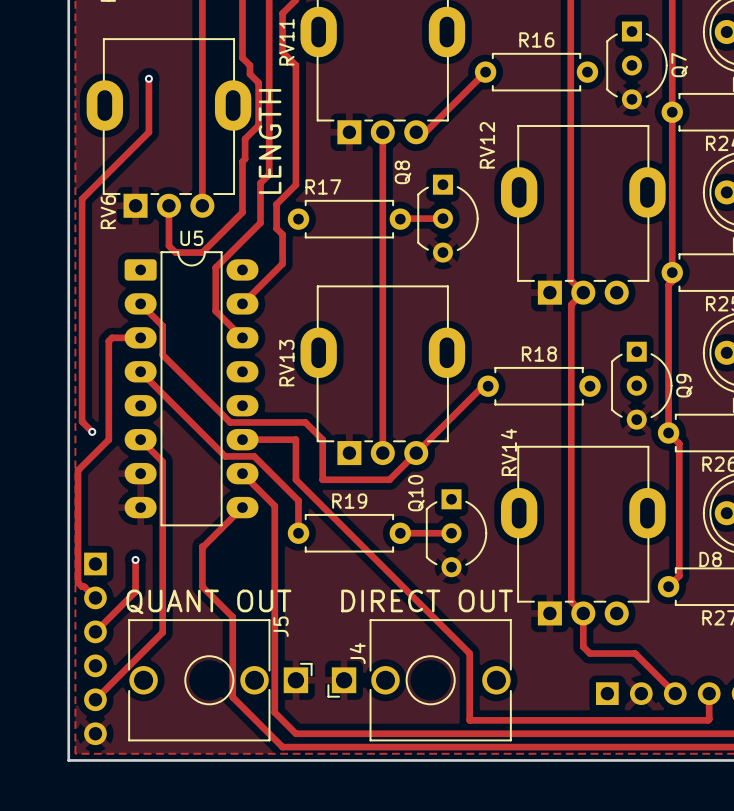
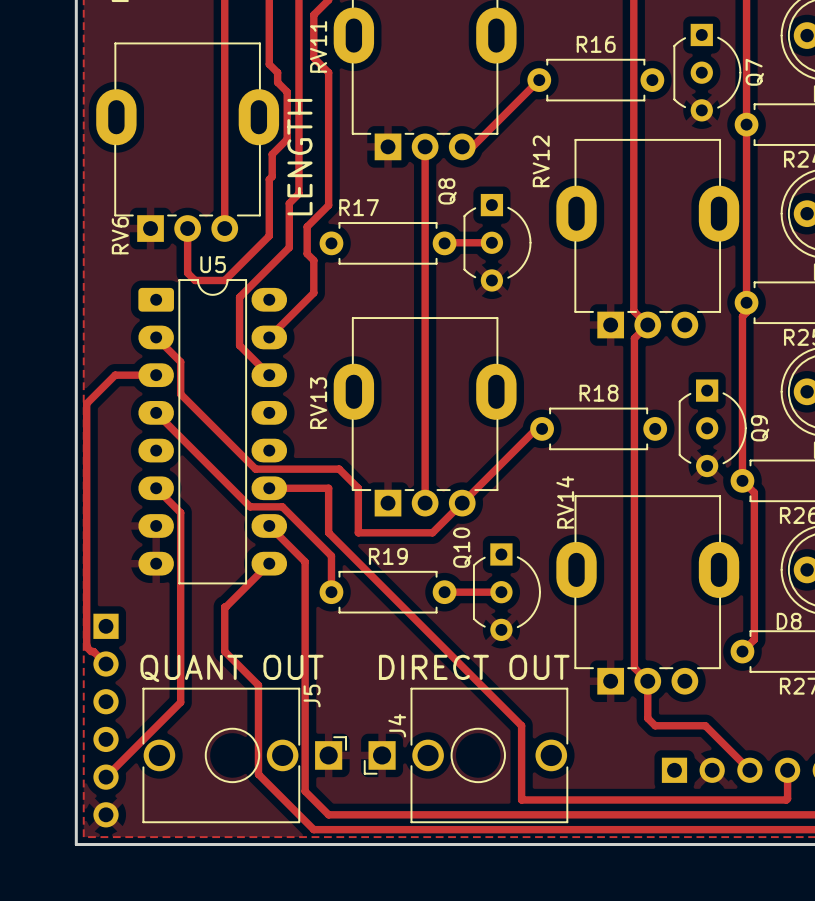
track: (148, 78) (148, 132) (82, 199) (82, 421) (92, 431) -> none
via: (148, 78) -> none
track: (112, 337) (108, 341) (108, 439) (78, 470) -> (124, 375) (115, 375) (86, 403) (86, 522)
via: (92, 431) -> none
track: (135, 559) (135, 591) (95, 631) -> none
via: (135, 559) -> none

